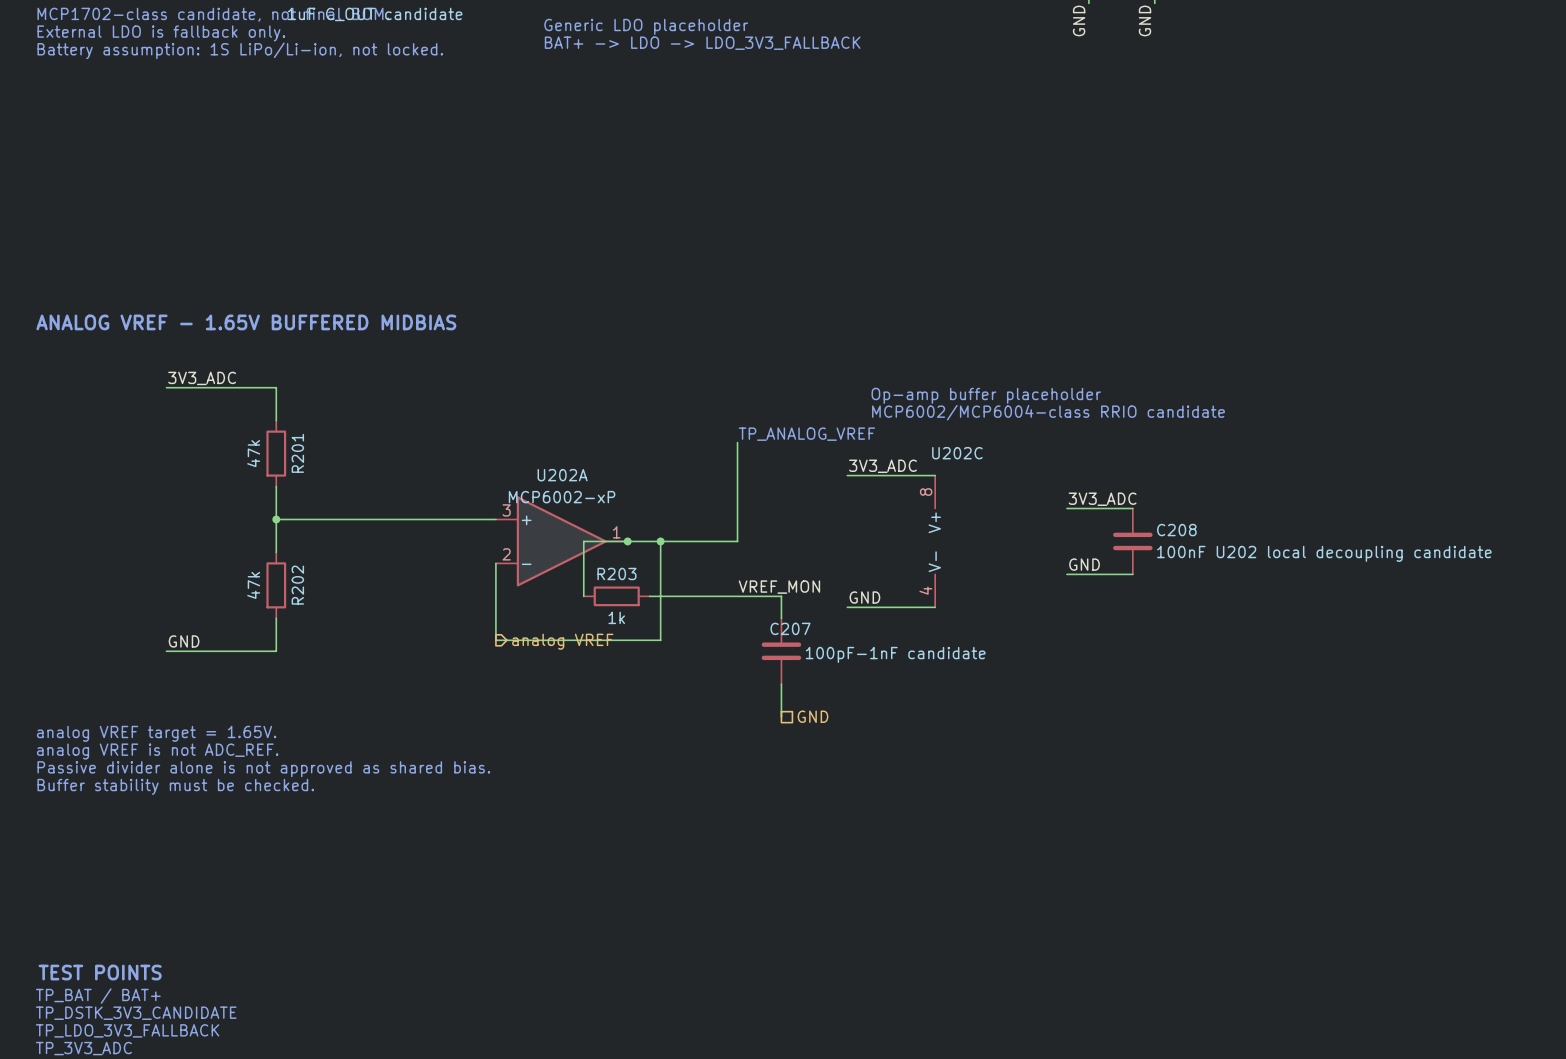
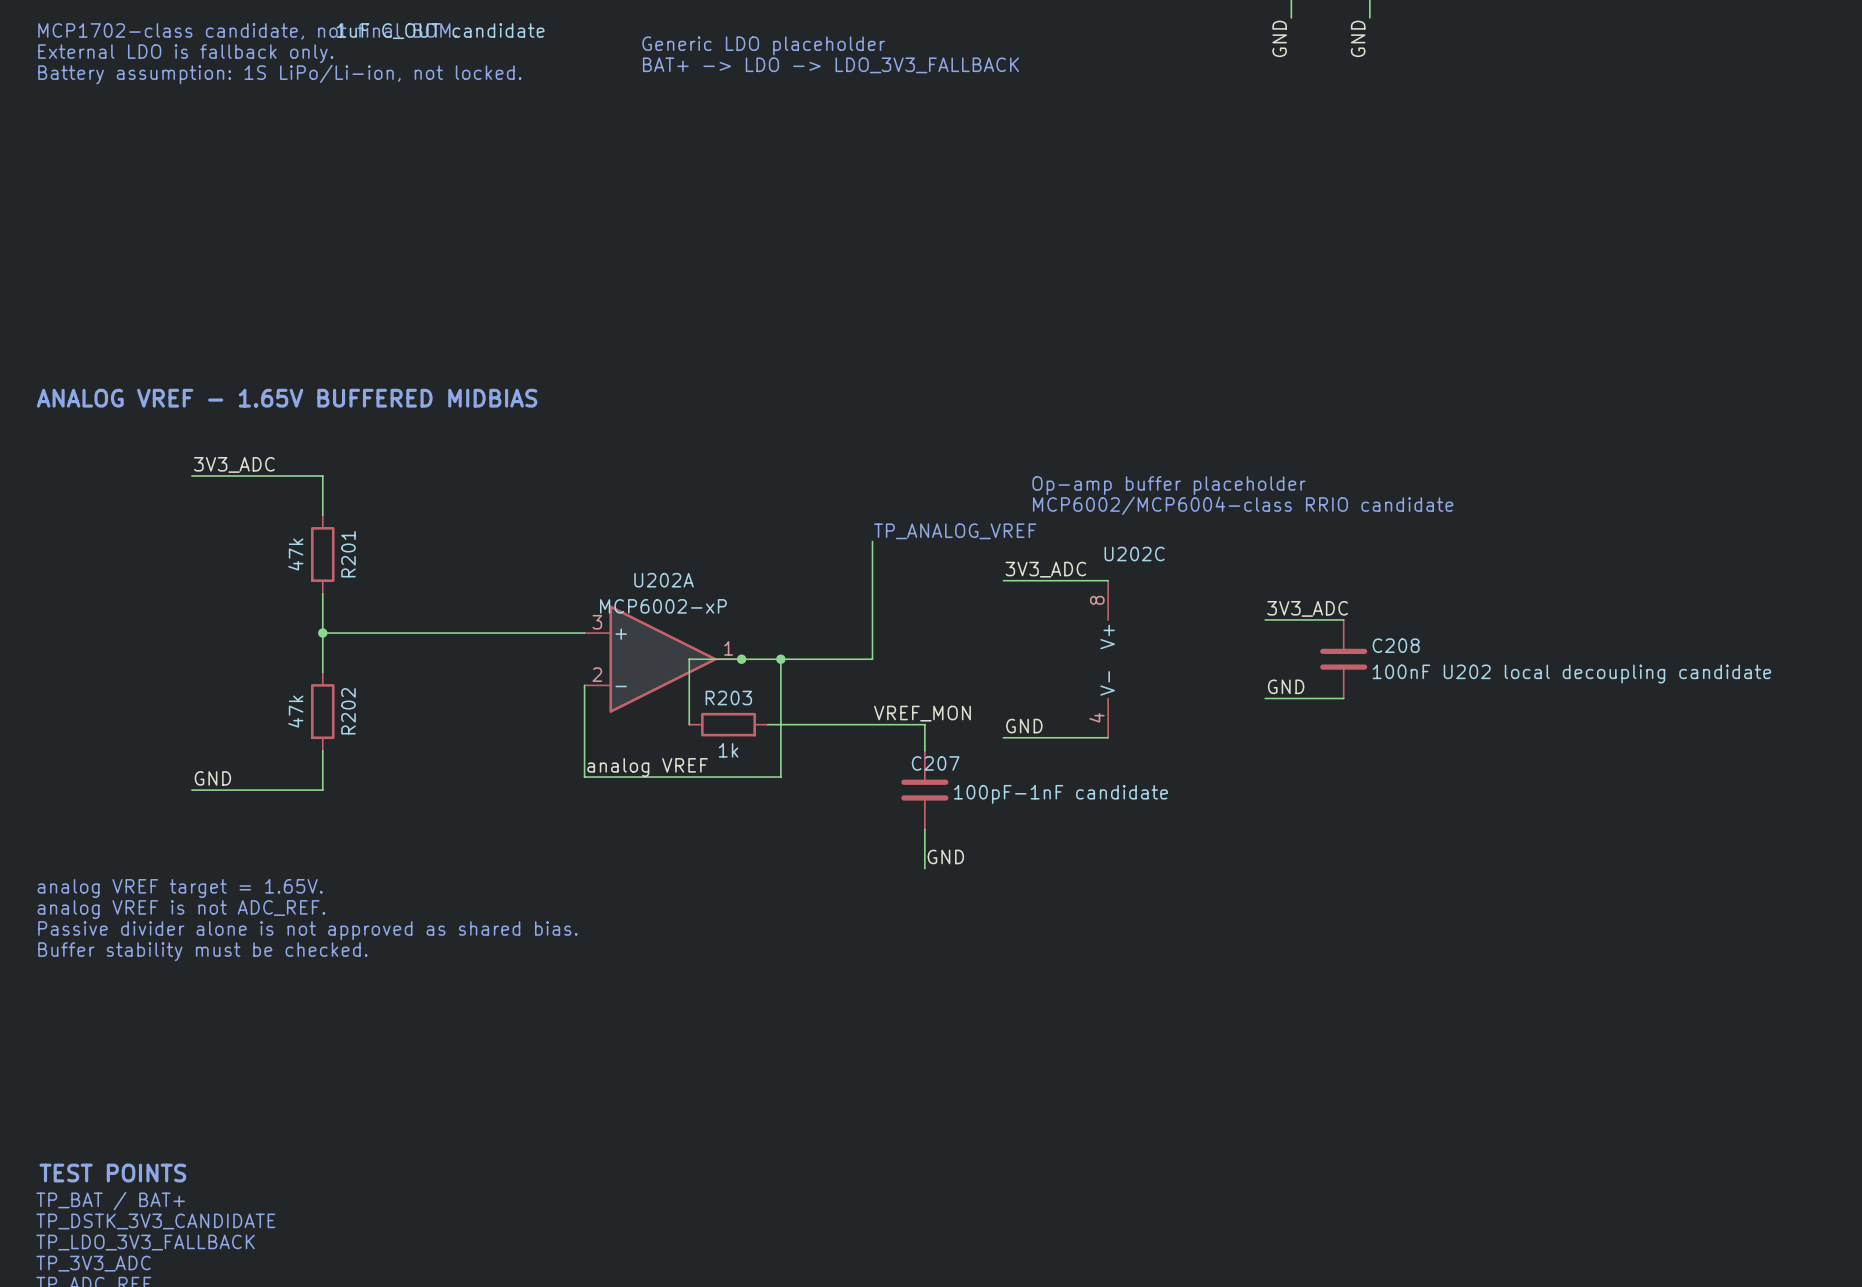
label: none -> analog VREF (647, 767)
hierarchical label: analog VREF (562, 641) -> none
label: none -> GND (945, 856)
hierarchical label: GND (812, 716) -> none

